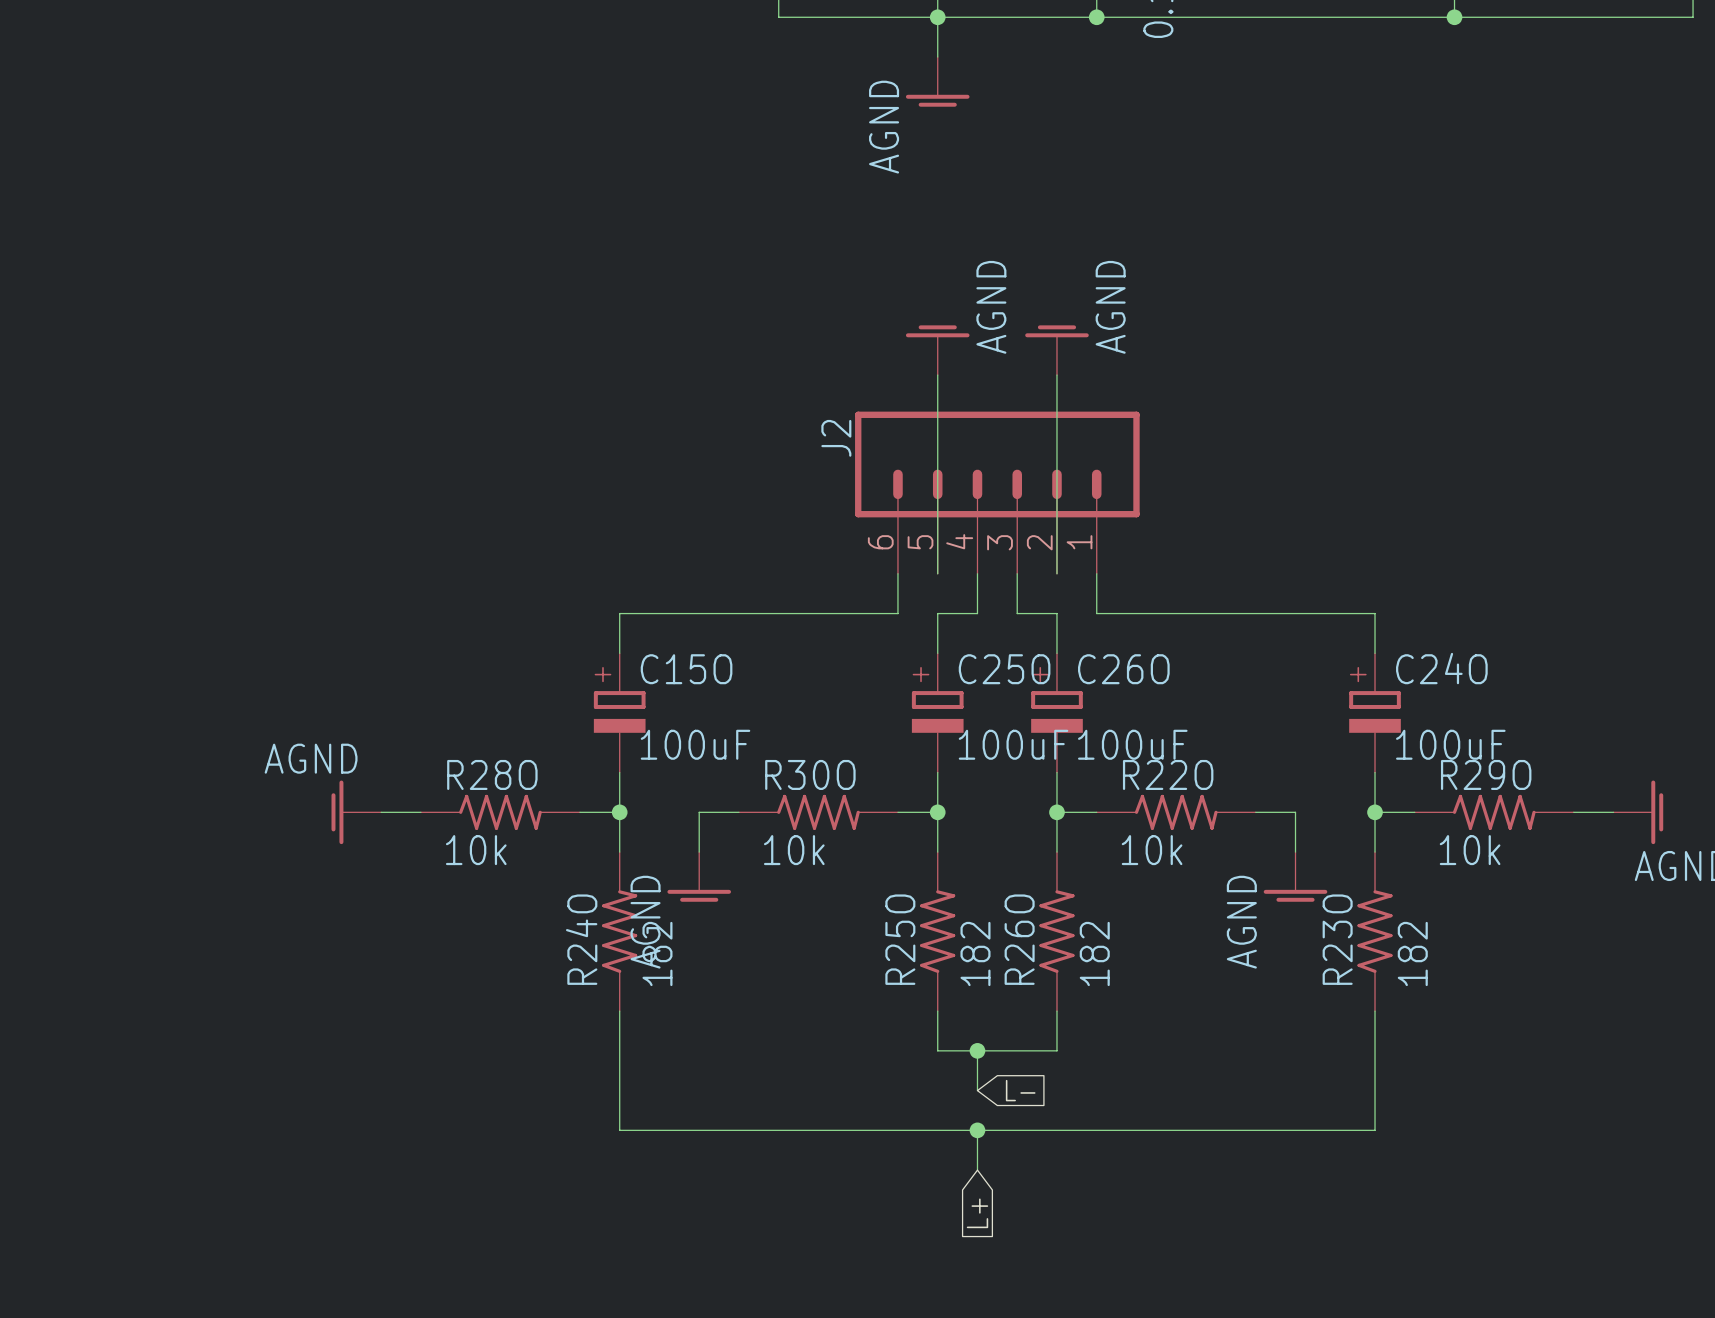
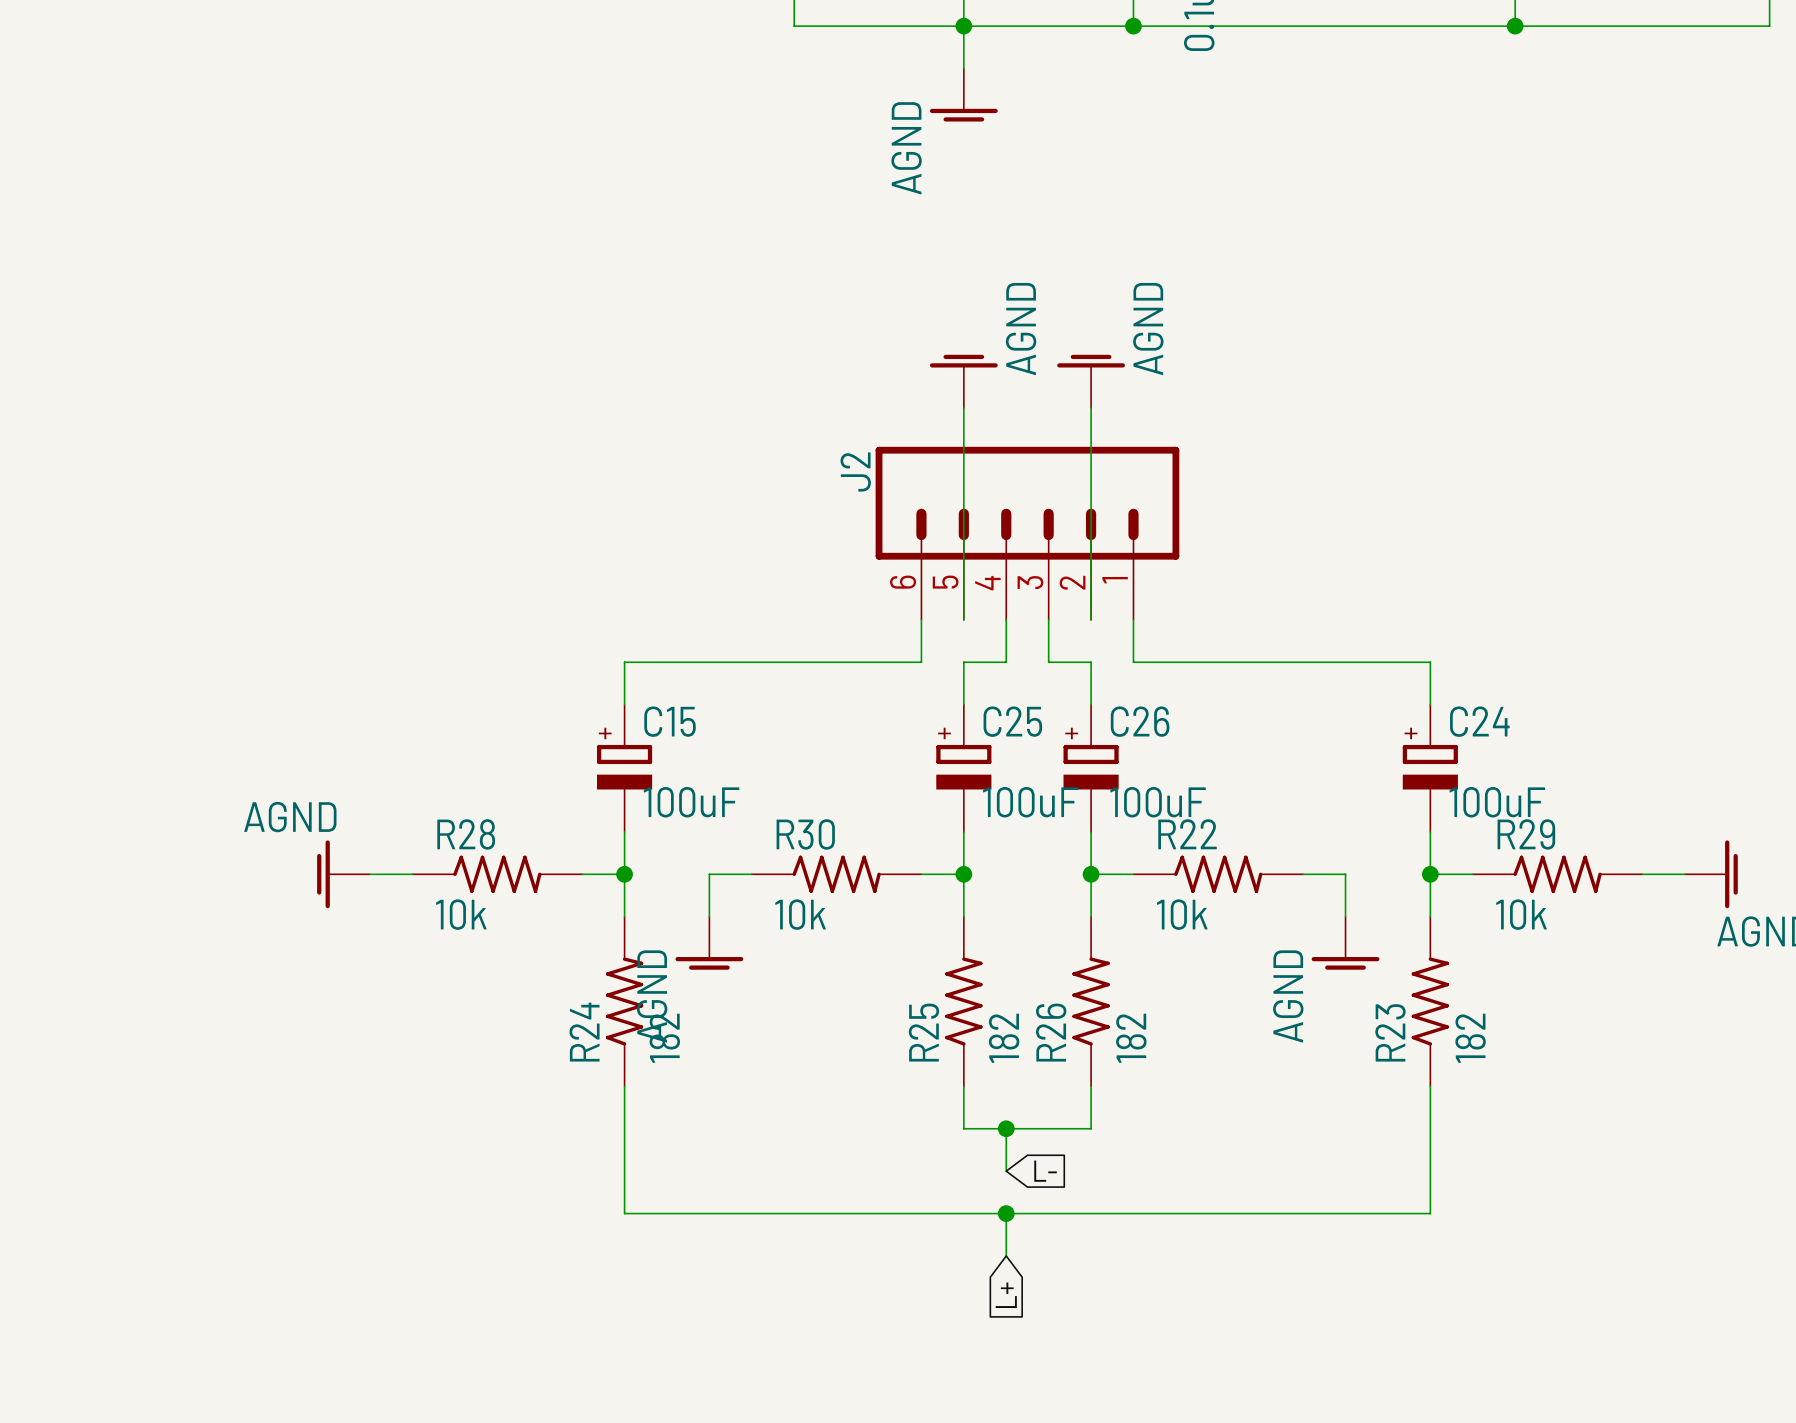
C24O name: C24O (1441, 668) -> C24 (1479, 721)
C15O name: C15O (686, 669) -> C15 (670, 721)
C25O name: C25O (1004, 669) -> C25 (1012, 721)
C26O name: C26O (1123, 669) -> C26 (1140, 721)
R28O name: R28O (492, 774) -> R28 (466, 834)
R30O name: R30O (810, 774) -> R30 (805, 834)
R22O name: R22O (1168, 774) -> R22 (1187, 834)
R29O name: R29O (1486, 774) -> R29 (1526, 834)
R24O name: R24O (581, 939) -> R24 (584, 1032)
R25O name: R25O (900, 939) -> R25 (923, 1032)
R26O name: R26O (1019, 939) -> R26 (1051, 1032)
R23O name: R23O (1337, 939) -> R23 (1390, 1032)

